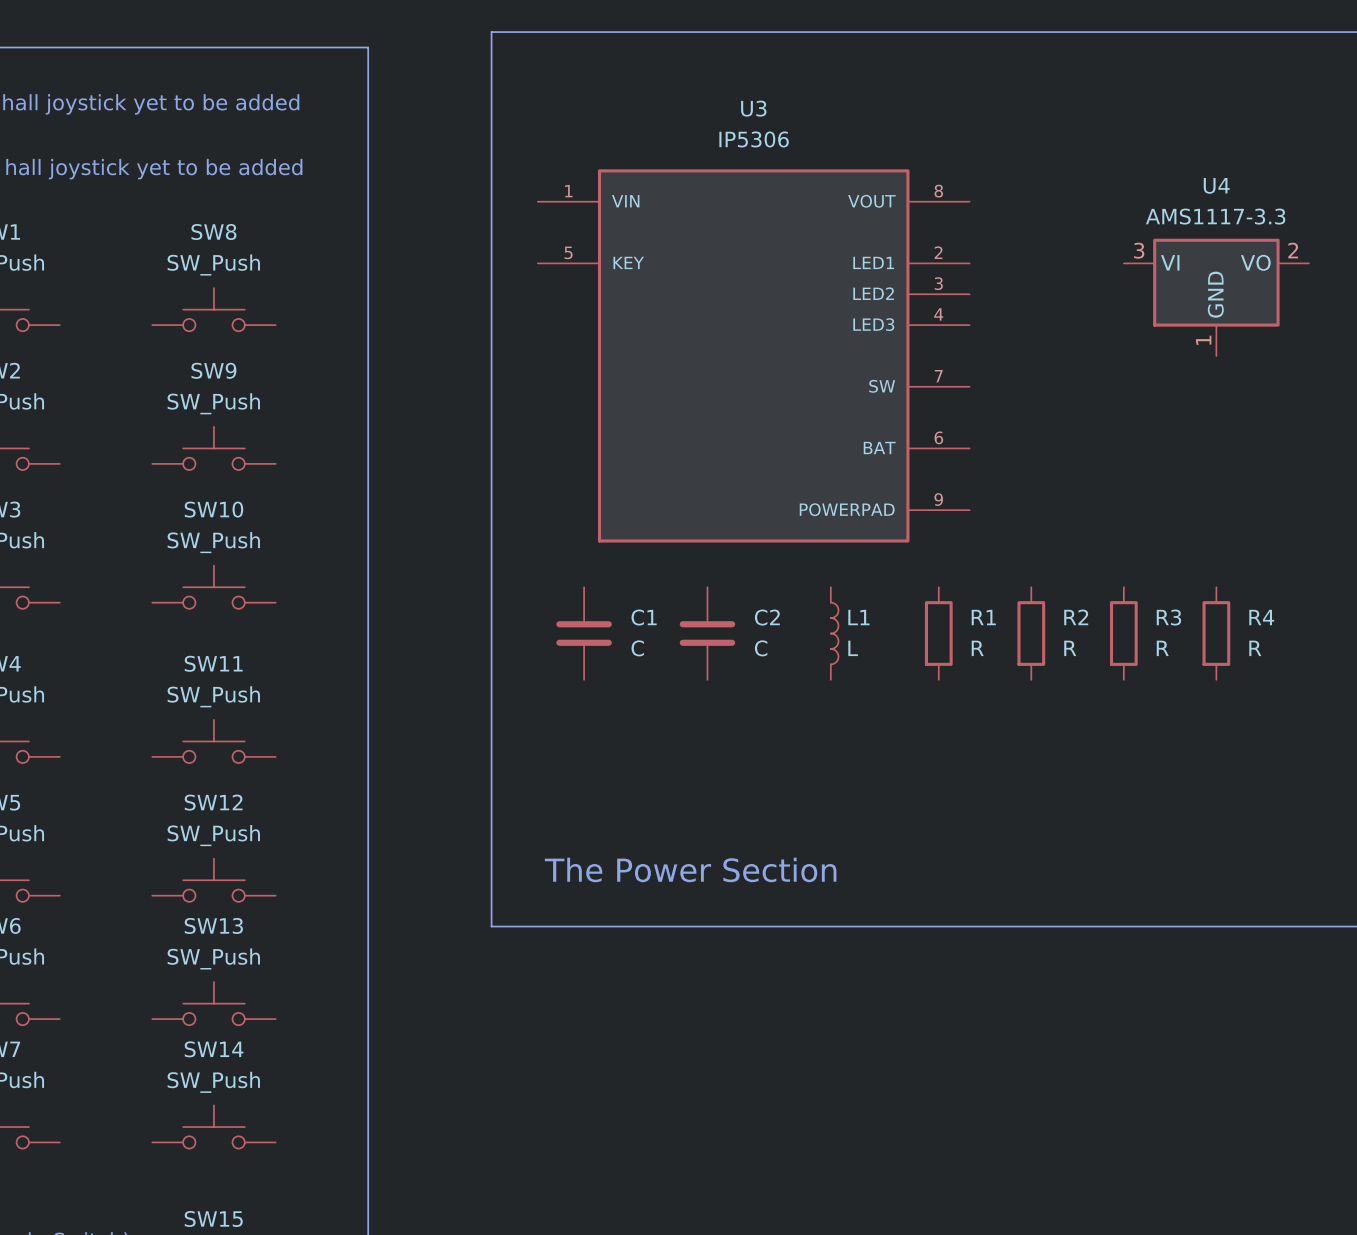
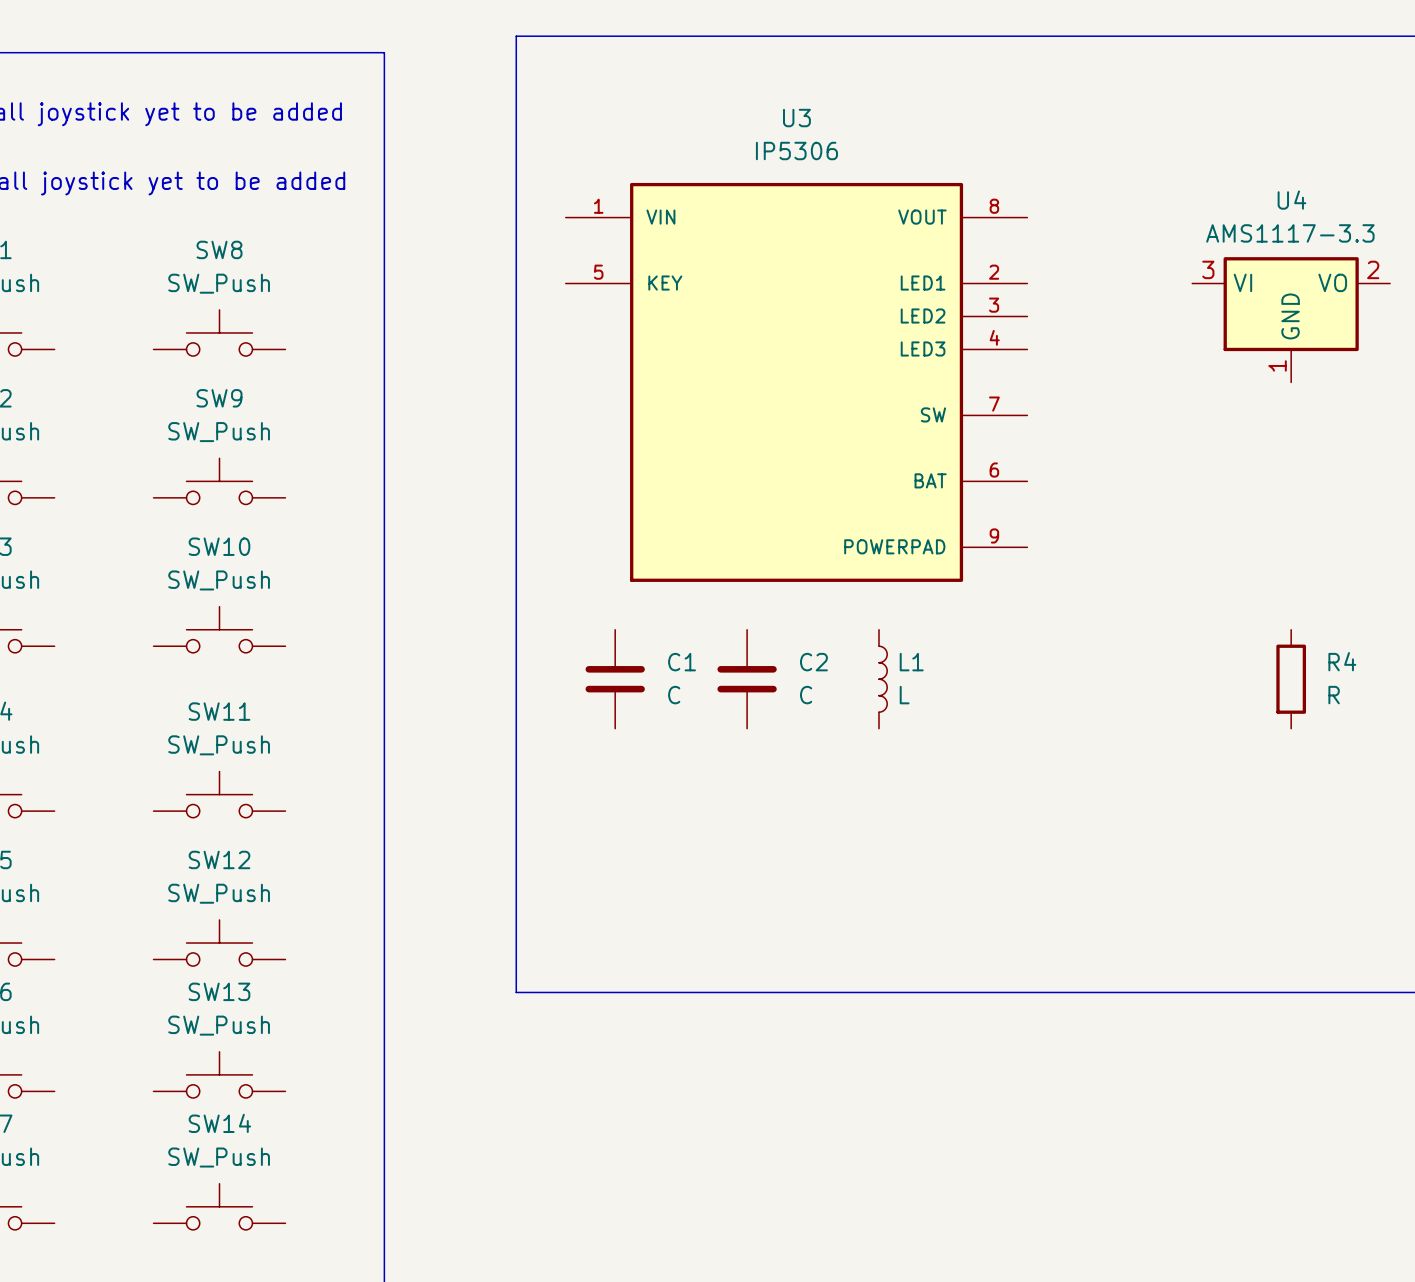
R1: R (938, 633) -> none
R2: R (1031, 633) -> none
R3: R (1123, 633) -> none
text: The Power Section (690, 869) -> none

